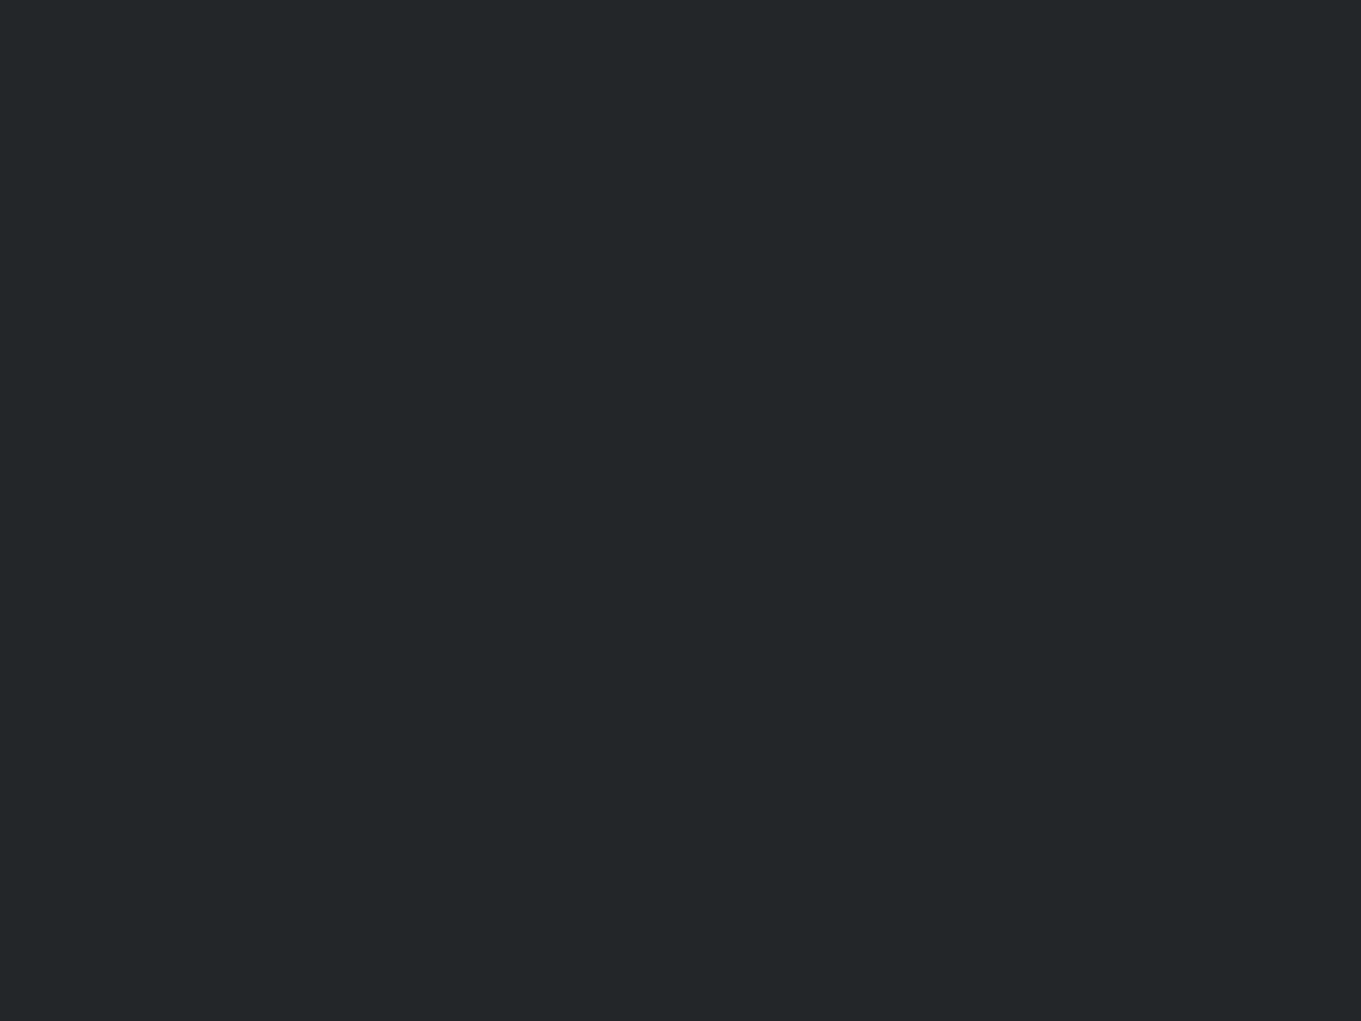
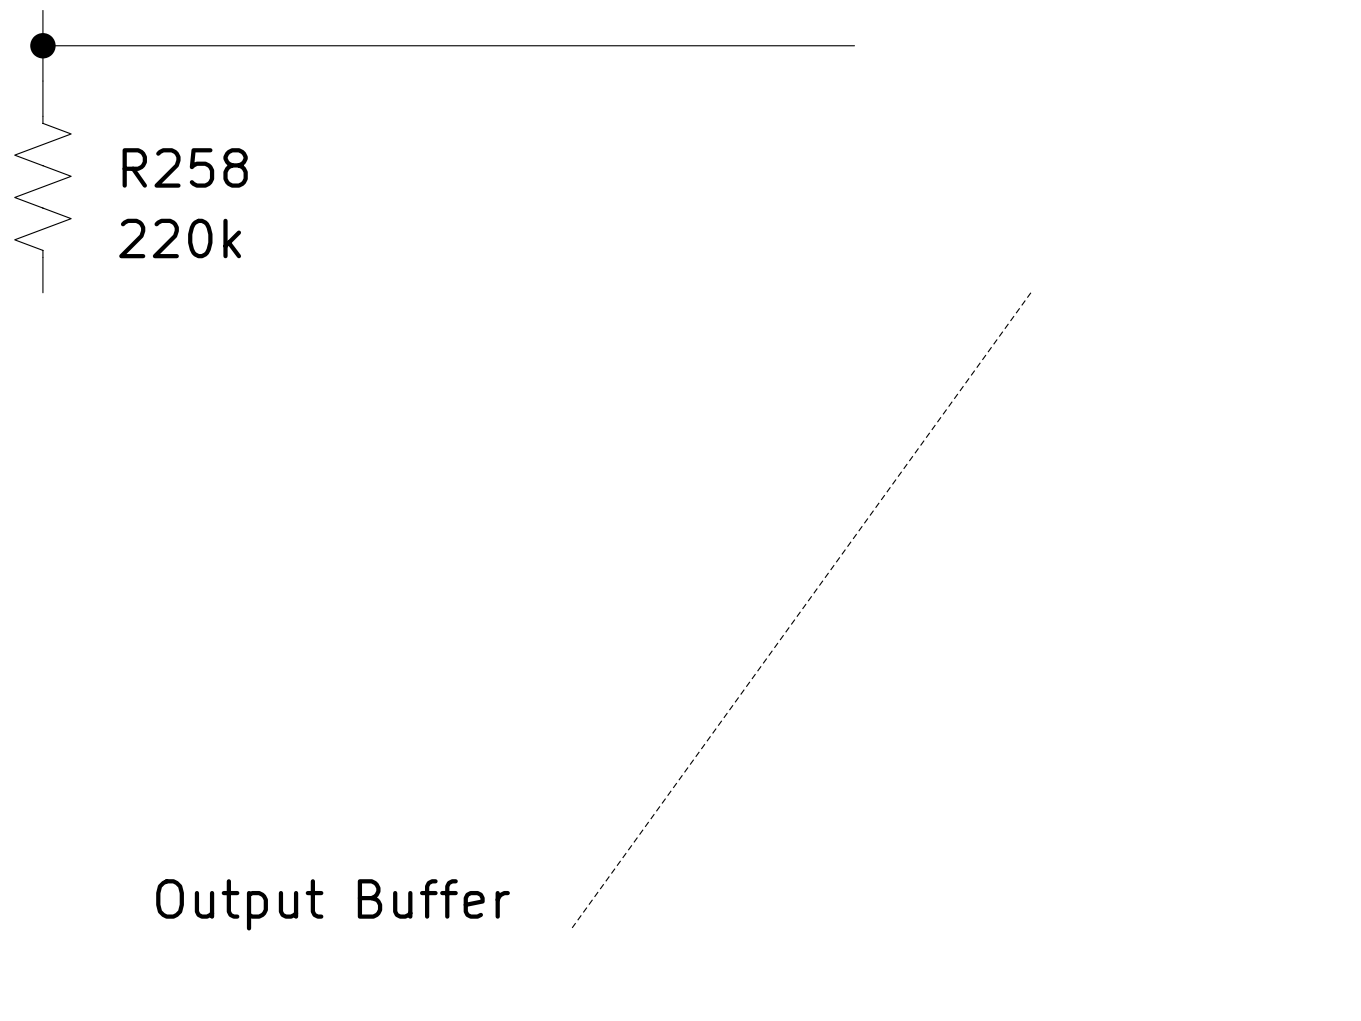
wire: none -> (42, 10) (42, 81)
wire: none -> (42, 45) (854, 45)
junction: none -> (42, 45)
R258: none -> 220k (42, 186)
line: none -> (1030, 292) (572, 927)
text: none -> Output Buffer (333, 904)

